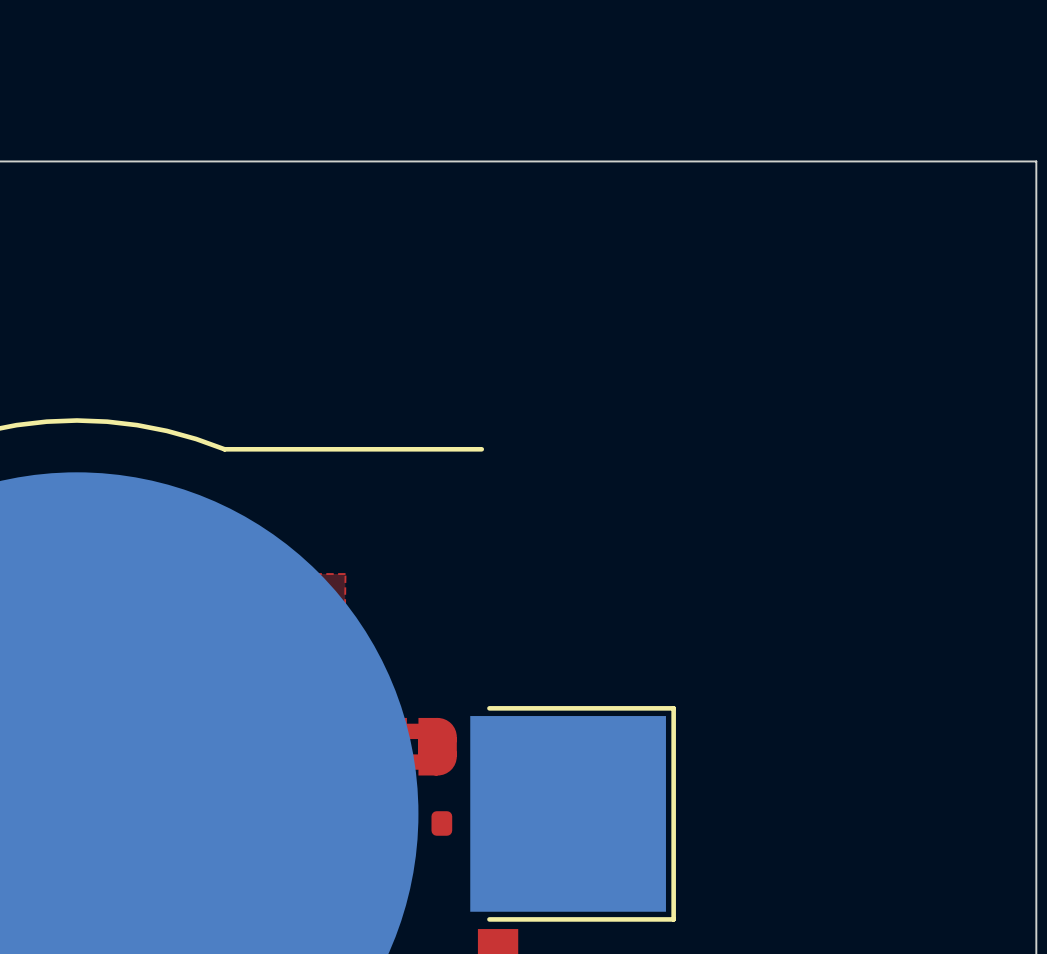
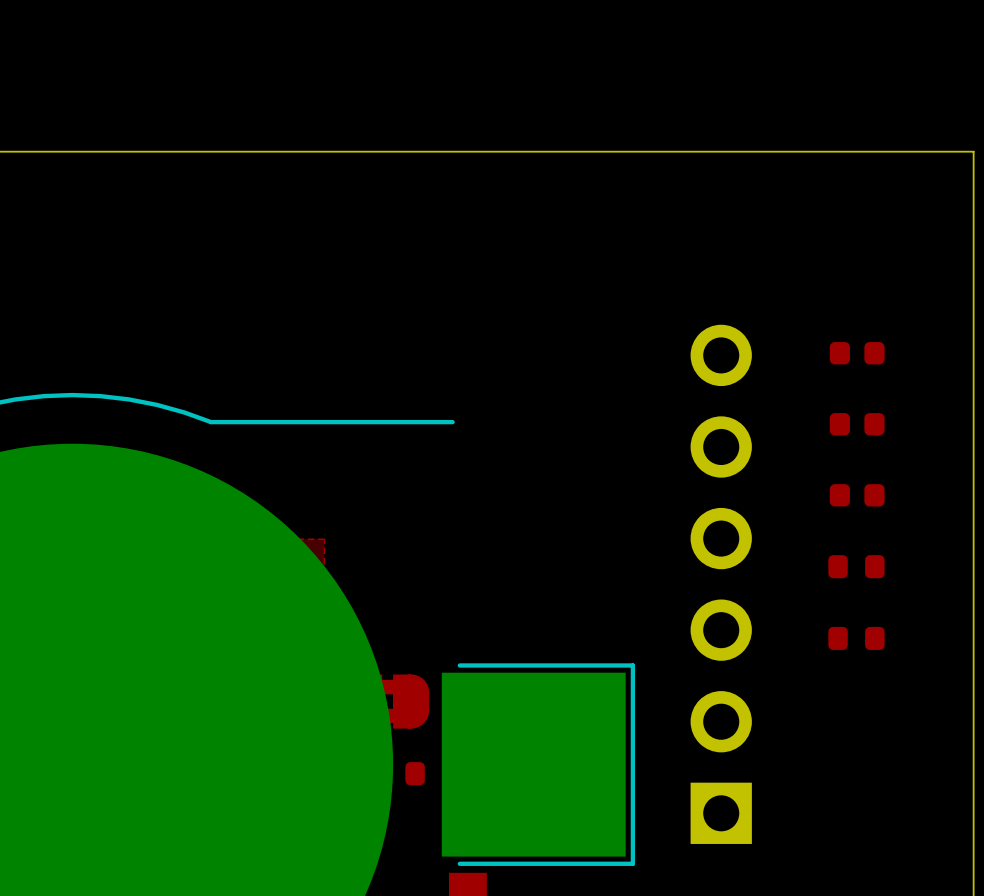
part: none -> (857, 353)
part: none -> (857, 424)
part: none -> (857, 495)
part: none -> (856, 566)
part: none -> (721, 584)
part: none -> (856, 638)

